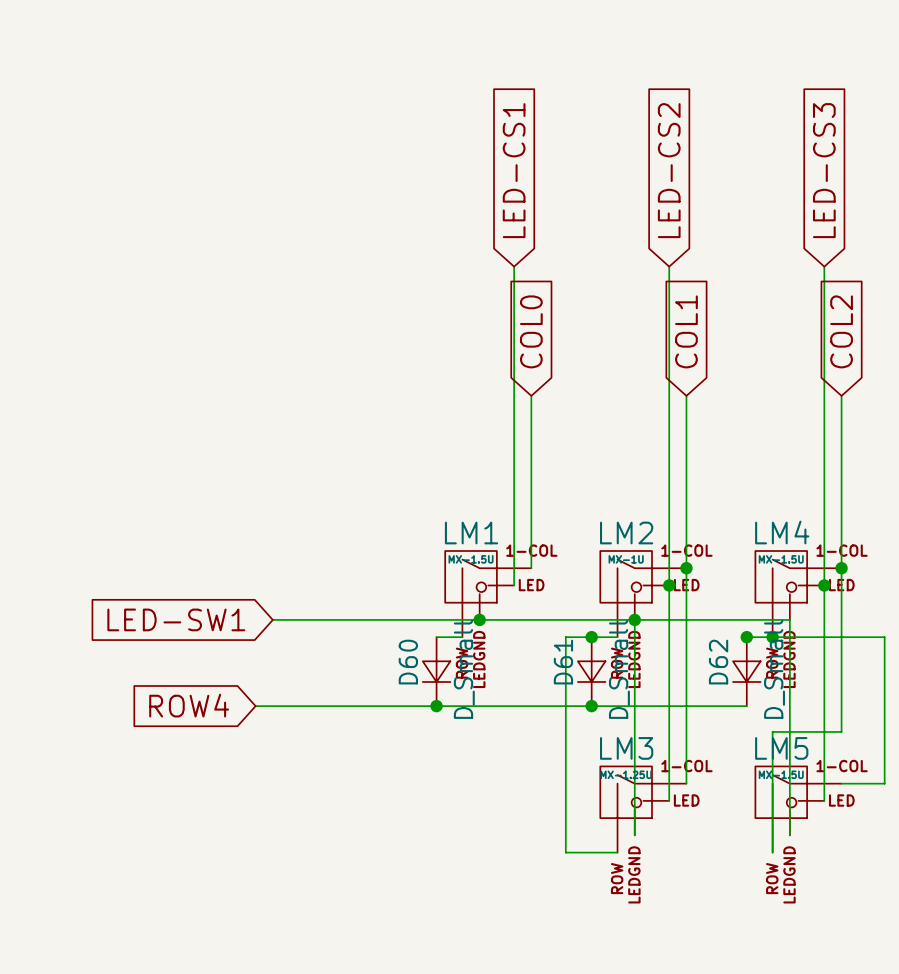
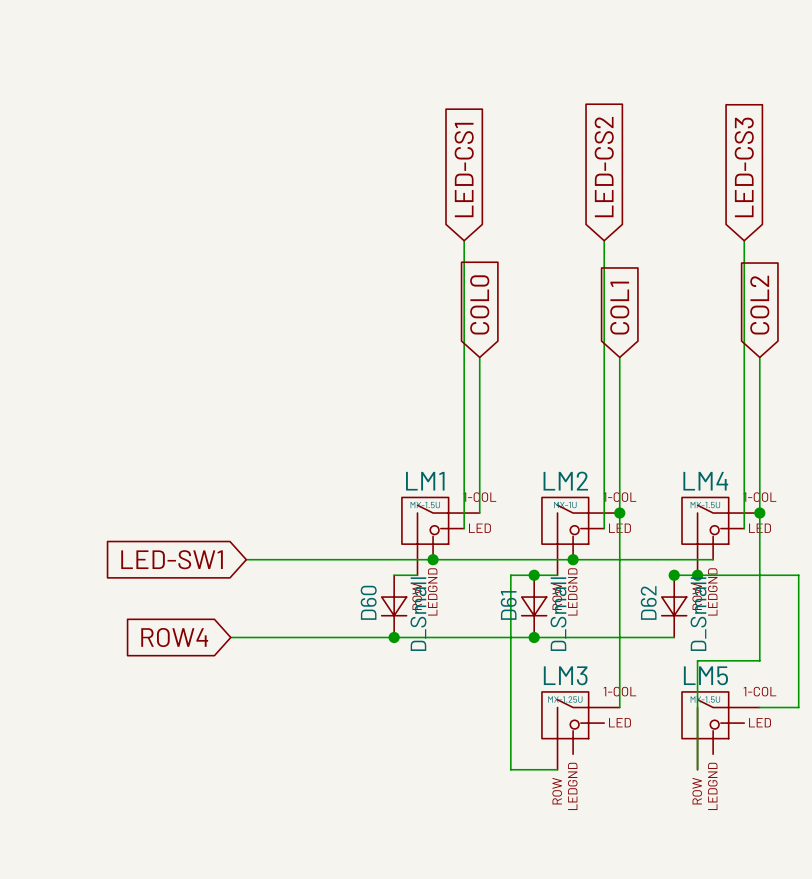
wire: (669, 585) (669, 800) -> none
junction: (669, 585) -> none
wire: (824, 585) (824, 800) -> none
junction: (824, 585) -> none
wire: (634, 619) (634, 835) -> none
wire: (789, 619) (789, 835) -> none

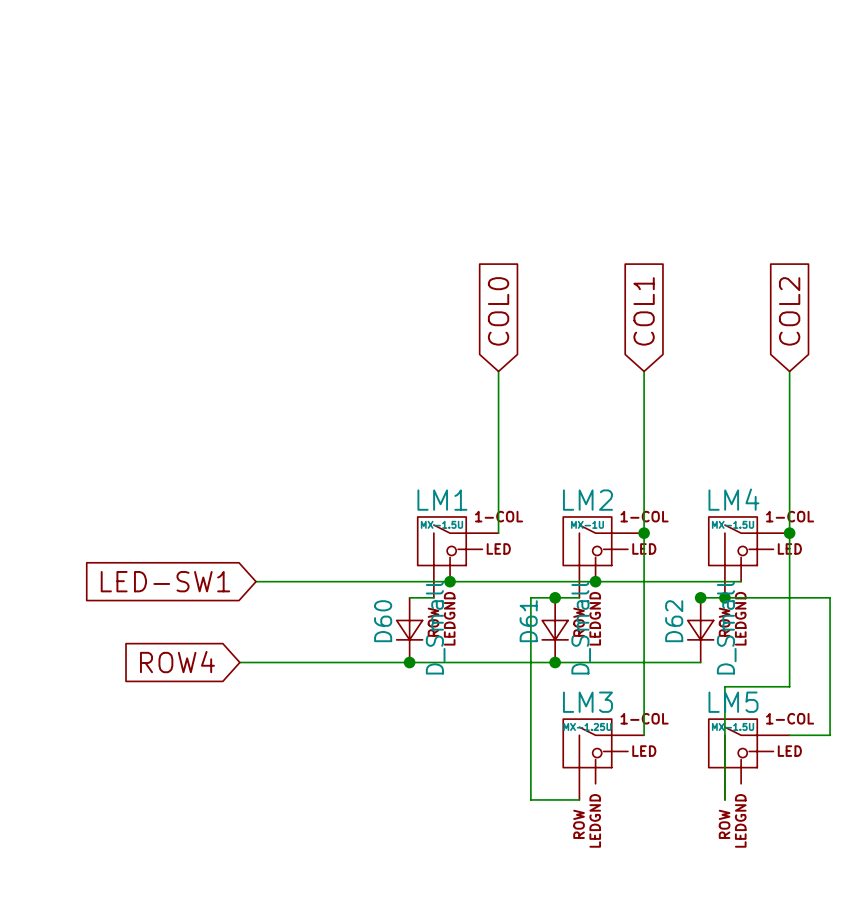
global label: LED-CS2 (604, 167) -> none
global label: LED-CS3 (744, 167) -> none
global label: LED-CS1 (464, 170) -> none
wire: (464, 240) (464, 528) -> none
wire: (604, 240) (604, 528) -> none
wire: (744, 240) (744, 528) -> none

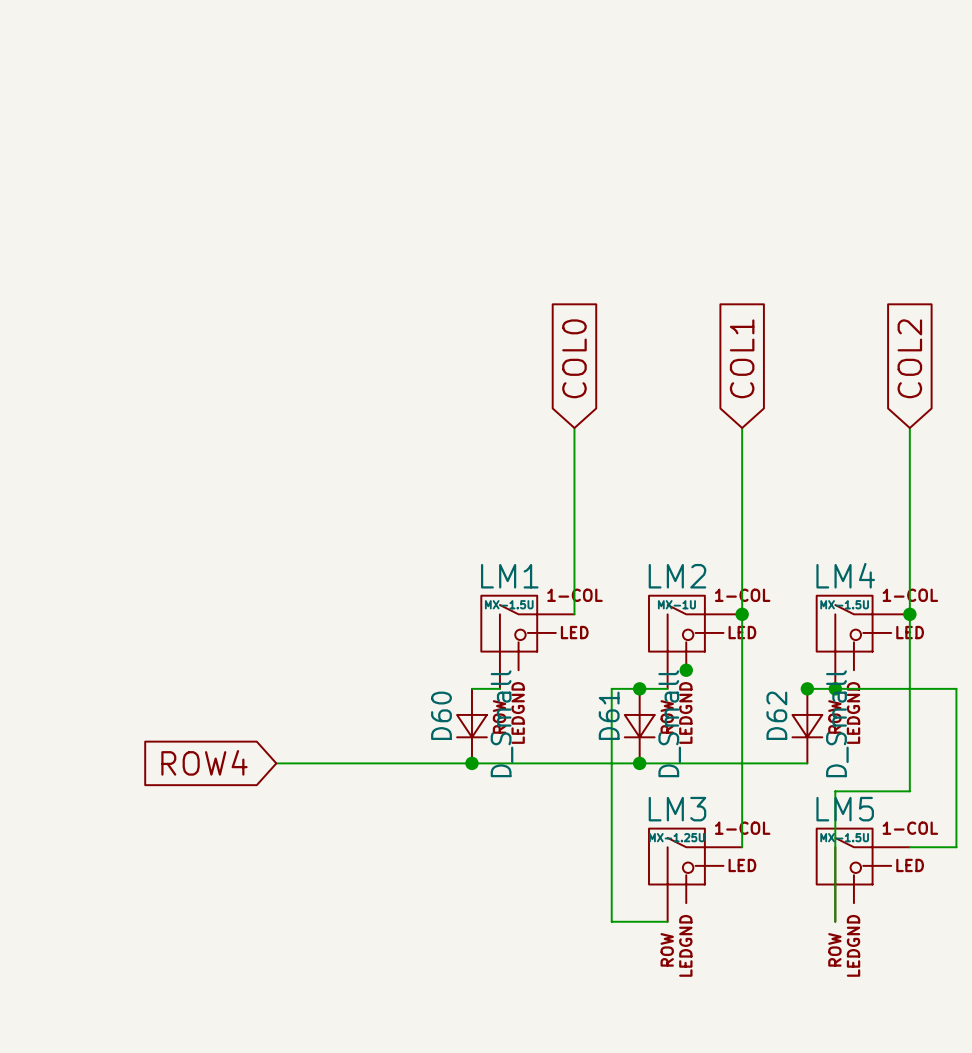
global label: LED-SW1 (165, 581) -> none
wire: (256, 581) (741, 581) -> none
junction: (450, 581) -> none

